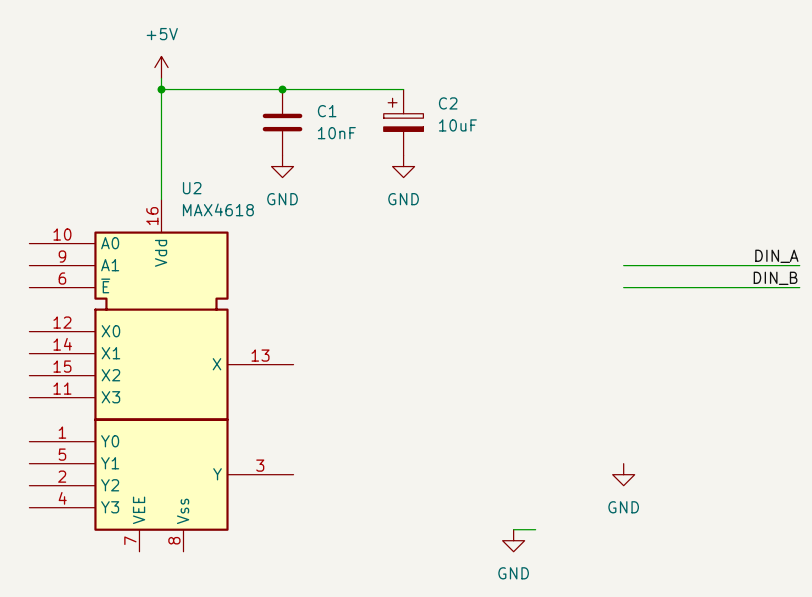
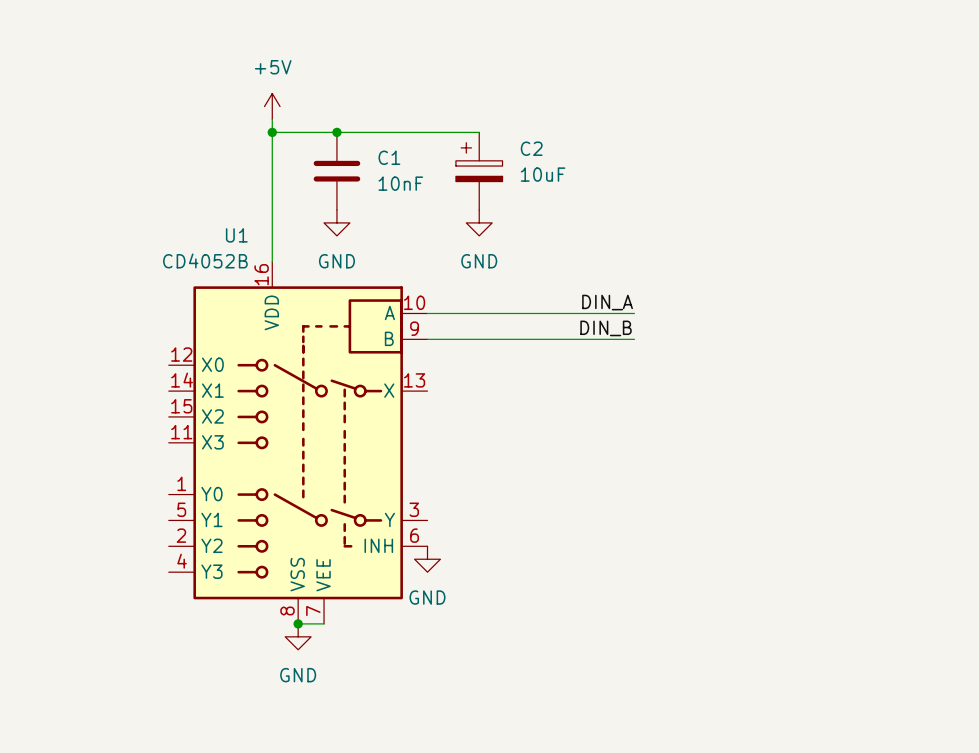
power symbol position: +5V (161, 67) -> +5V (272, 106)
wire: (161, 78) (161, 199) -> (272, 119) (272, 261)
wire: (161, 89) (227, 89) -> none
junction: (161, 89) -> none
junction: none -> (272, 132)
label: none -> DIN_A (607, 302)
wire: none -> (427, 313) (634, 313)
label: none -> DIN_B (606, 328)
label: DIN_A (776, 256) -> none
wire: none -> (427, 339) (634, 339)
wire: (623, 265) (799, 265) -> none
label: DIN_B (775, 278) -> none
wire: (623, 287) (799, 287) -> none
U1: none -> CD4052B (298, 442)
U2: MAX4618 (161, 375) -> none
power symbol: none -> GND (427, 559)
power symbol: GND (623, 474) -> none
wire: none -> (298, 623) (324, 623)
junction: none -> (298, 623)
power symbol: none -> GND (298, 636)
wire: (513, 529) (535, 529) -> none
power symbol: GND (513, 540) -> none

